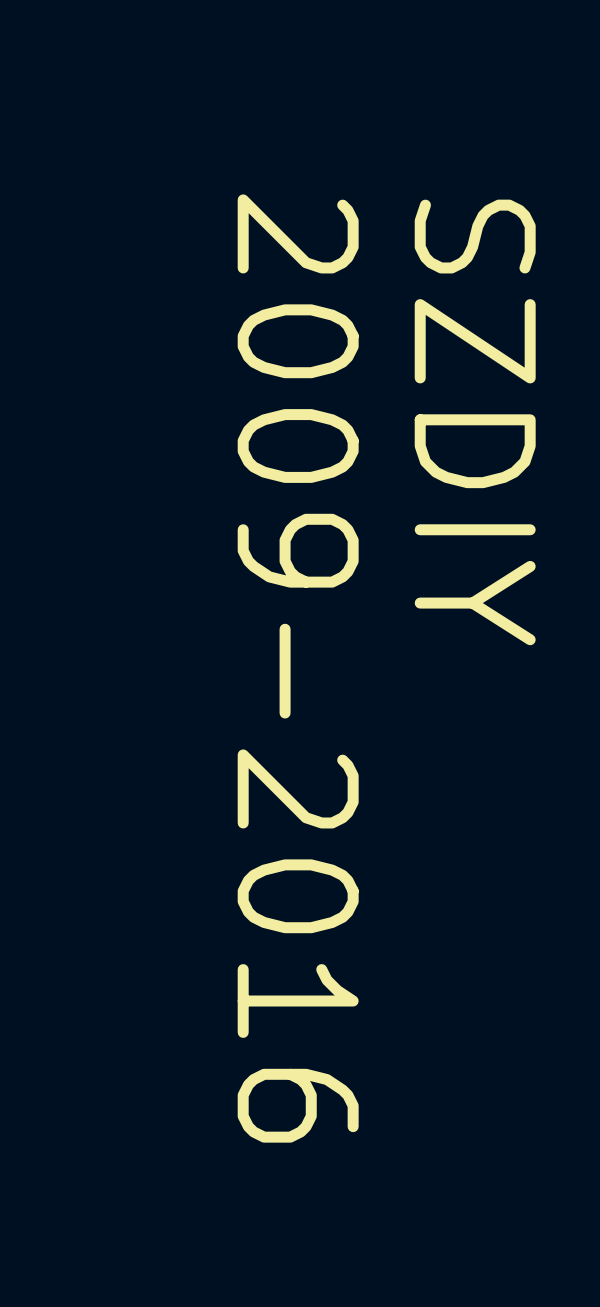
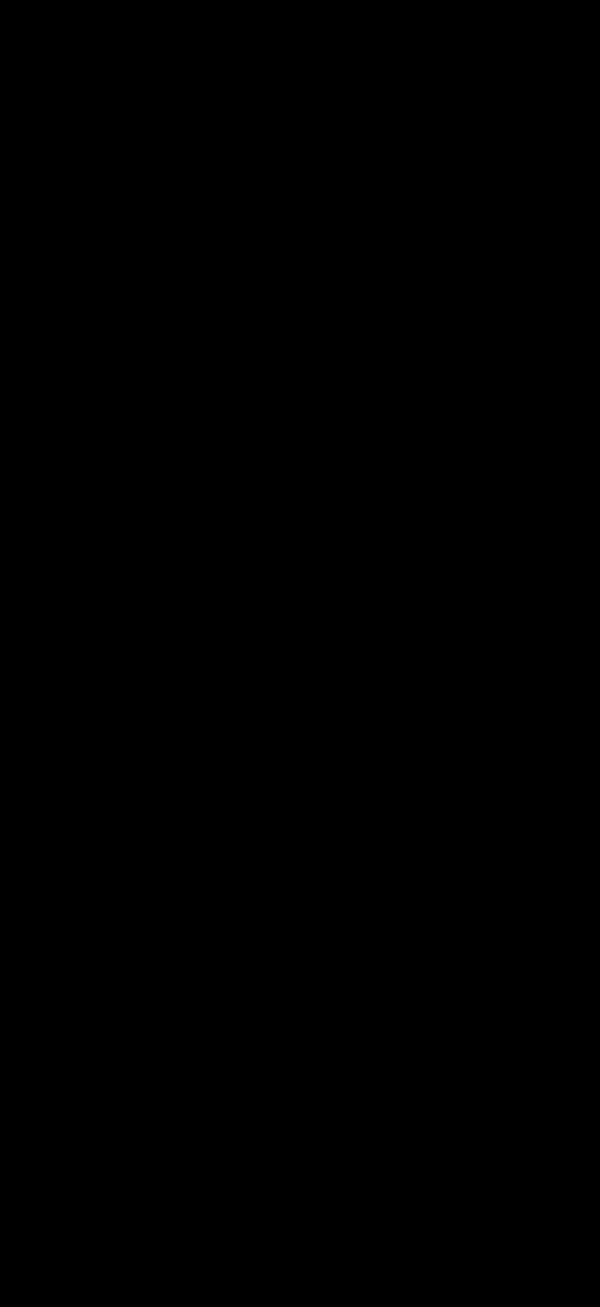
text: SZDIY (475, 422) -> none
text: 2009-2016 (298, 668) -> none

